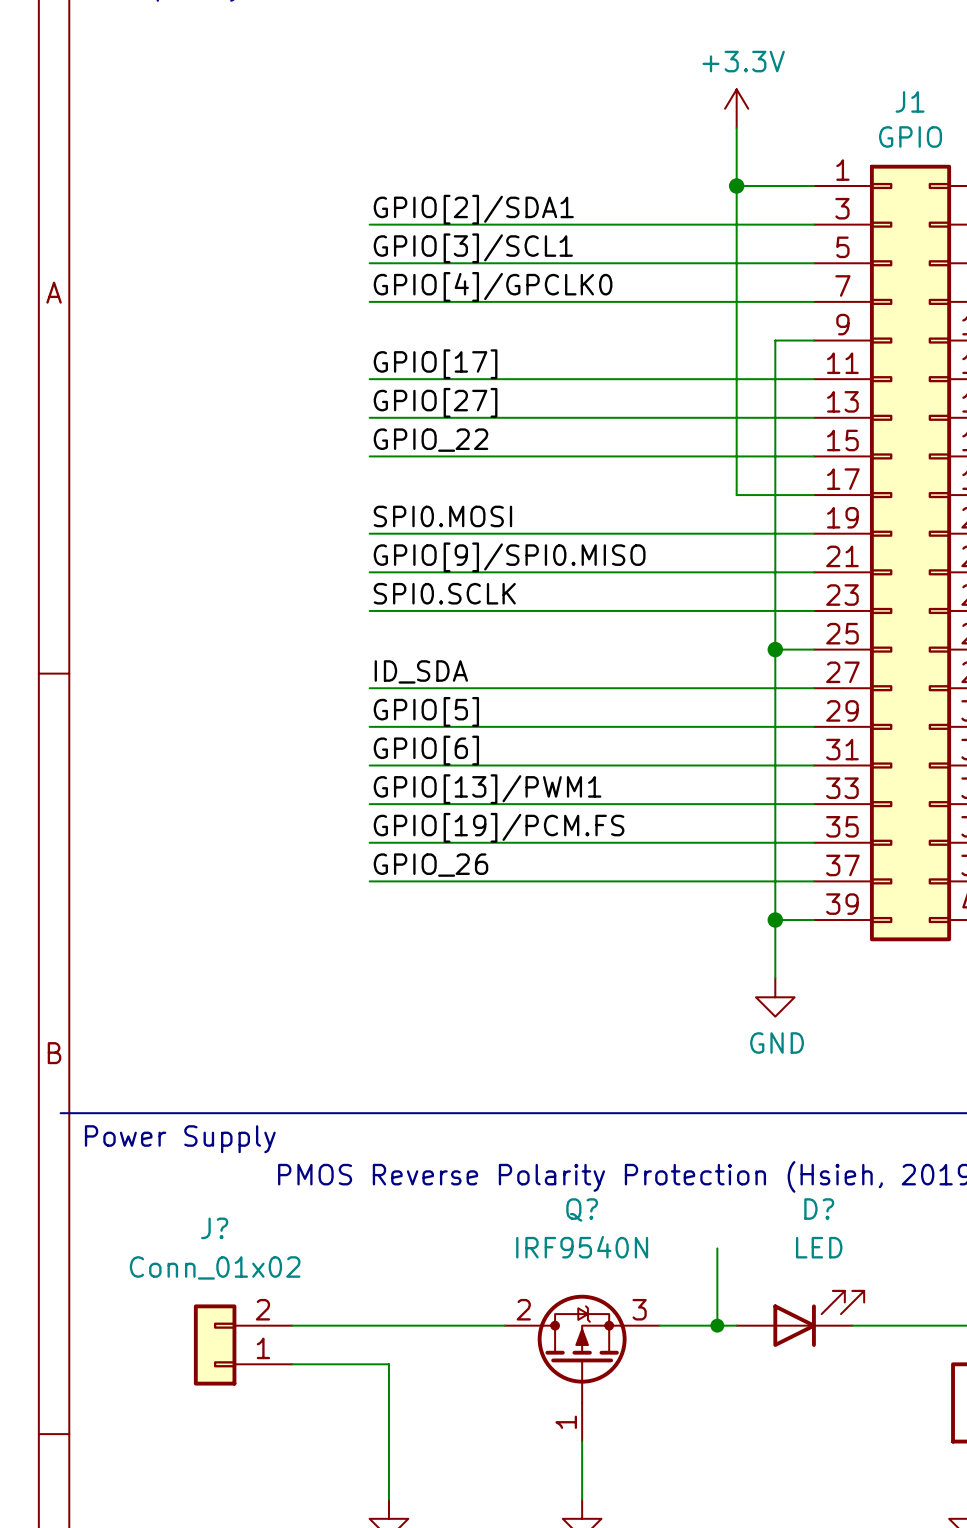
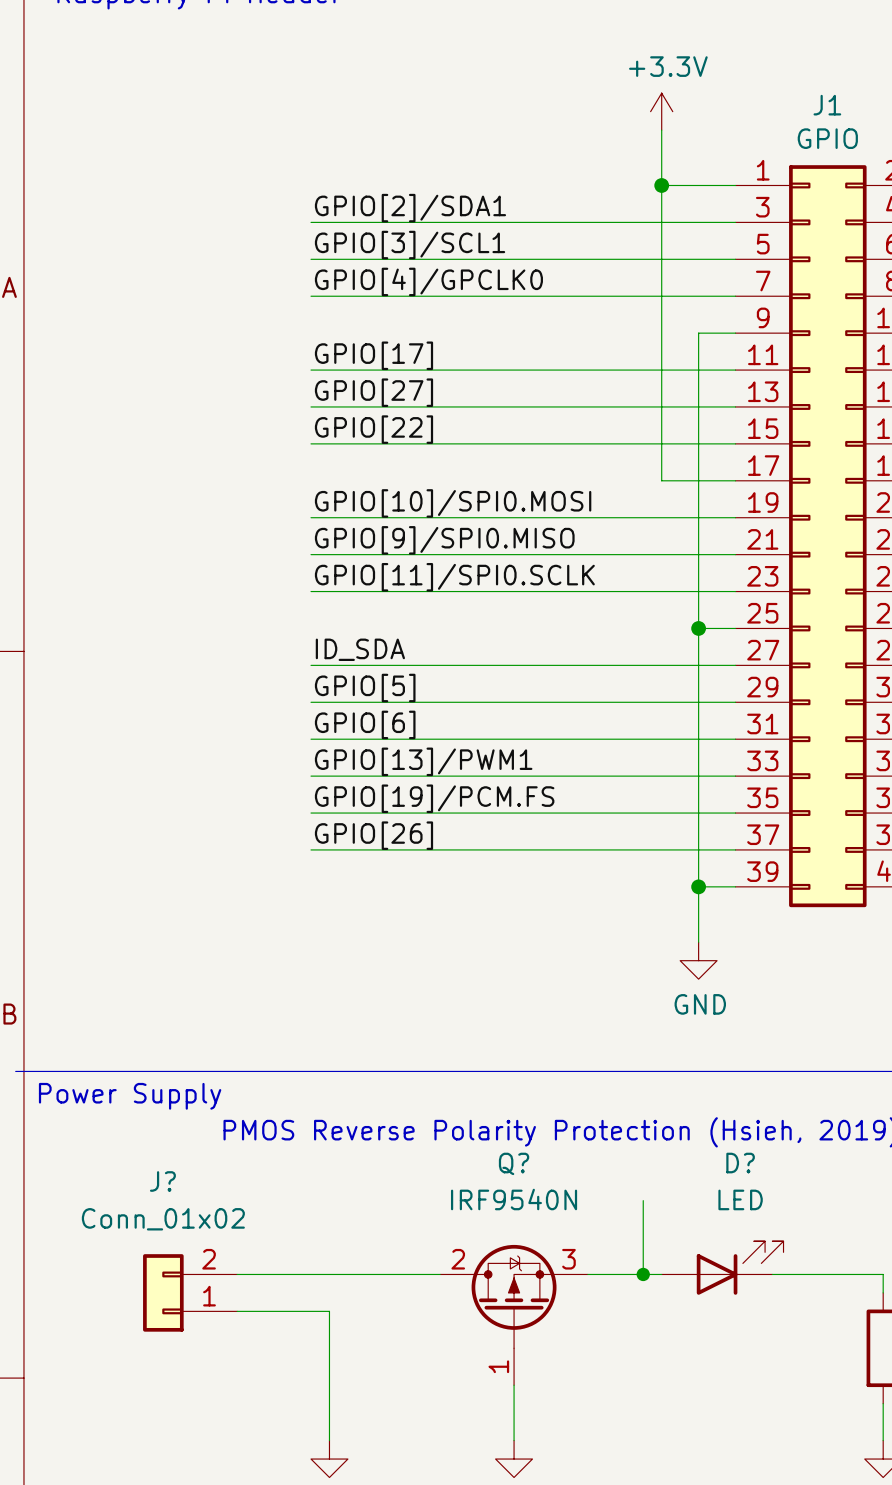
label: GPIO_22 (430, 440) -> GPIO[22] (373, 429)
label: SPI0.MOSI (442, 516) -> GPIO[10]/SPI0.MOSI (453, 503)
label: SPI0.SCLK (444, 593) -> GPIO[11]/SPI0.SCLK (454, 577)
label: GPIO_26 (430, 865) -> GPIO[26] (373, 835)

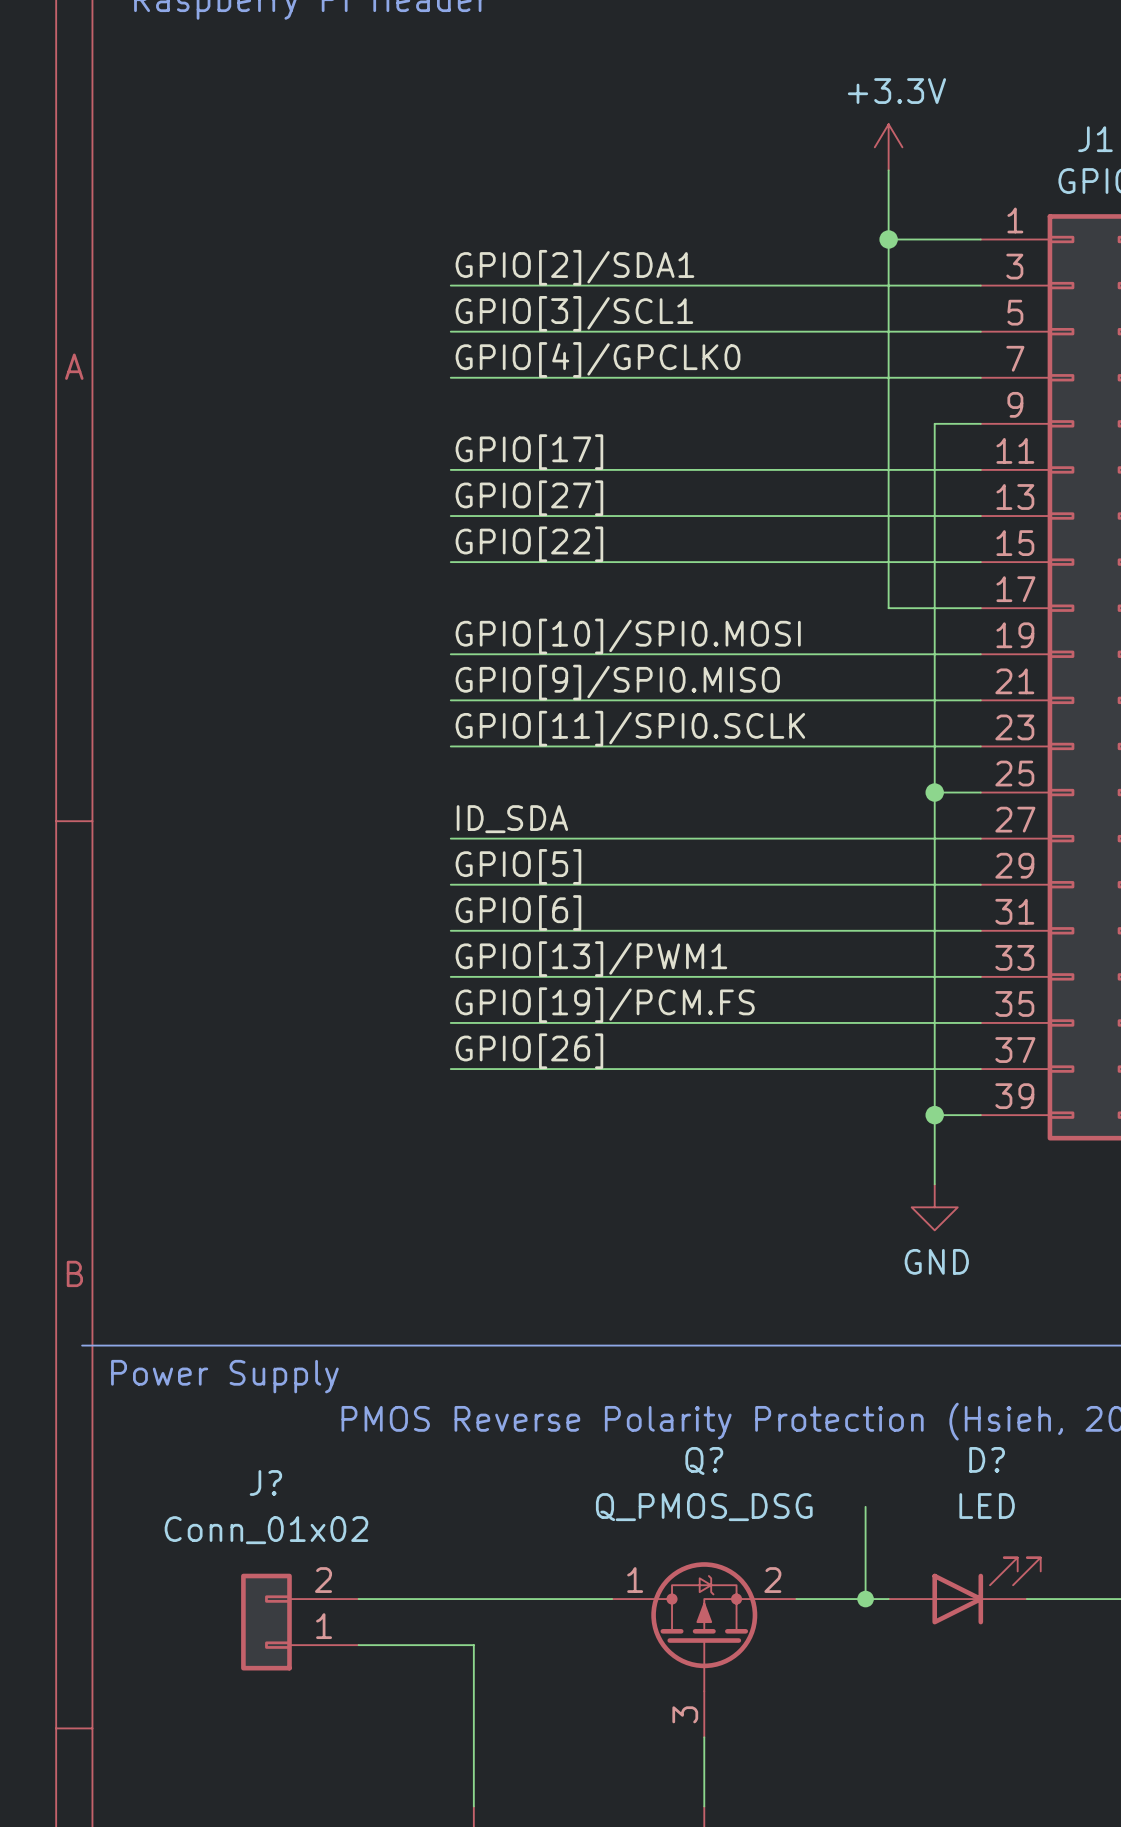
Q? value: IRF9540N (514, 1199) -> Q_PMOS_DSG (704, 1507)
Q? pin number: 2 (458, 1259) -> 1 (635, 1580)
Q? pin number: 3 (568, 1259) -> 2 (772, 1580)
Q? pin number: 1 (498, 1366) -> 3 (685, 1714)

